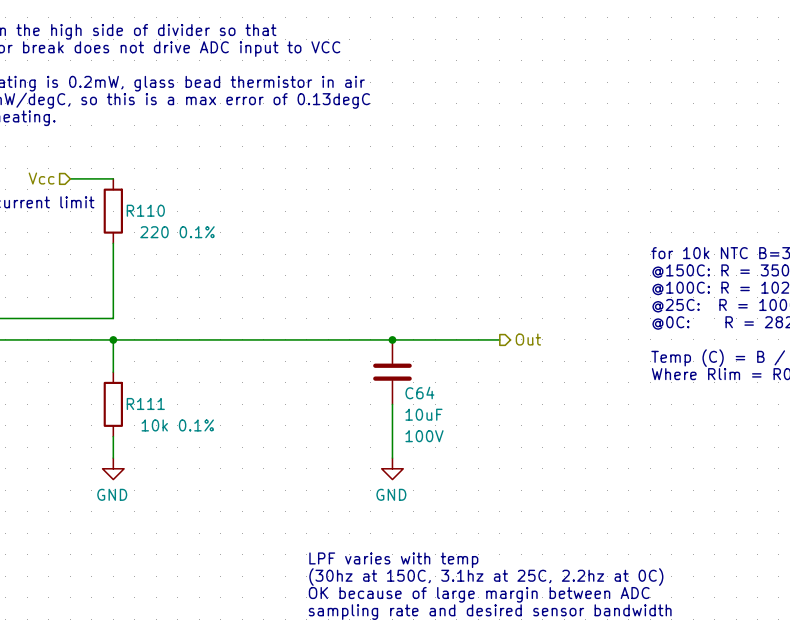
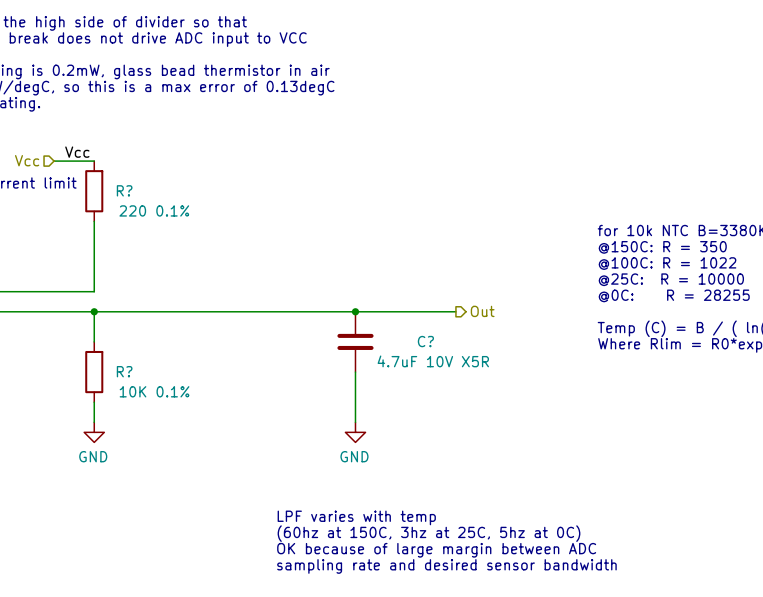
label: none -> Vcc (77, 152)
R110 name: R110 (145, 210) -> R? (124, 190)
C64 name: C64 (419, 392) -> C? (425, 341)
R111 name: R111 (145, 403) -> R? (124, 371)
C64 value: 10uF (423, 414) -> 4.7uF 10V X5R (433, 361)
R111 value: 10k 0.1% (177, 425) -> 10K 0.1% (154, 391)
C64 text: 100V (424, 436) -> none
text: (30hz at 150C, 3.1hz at 25C, 2.2hz at 0C) (486, 577) -> (60hz at 150C, 3hz at 25C, 5hz at 0C) (429, 533)

